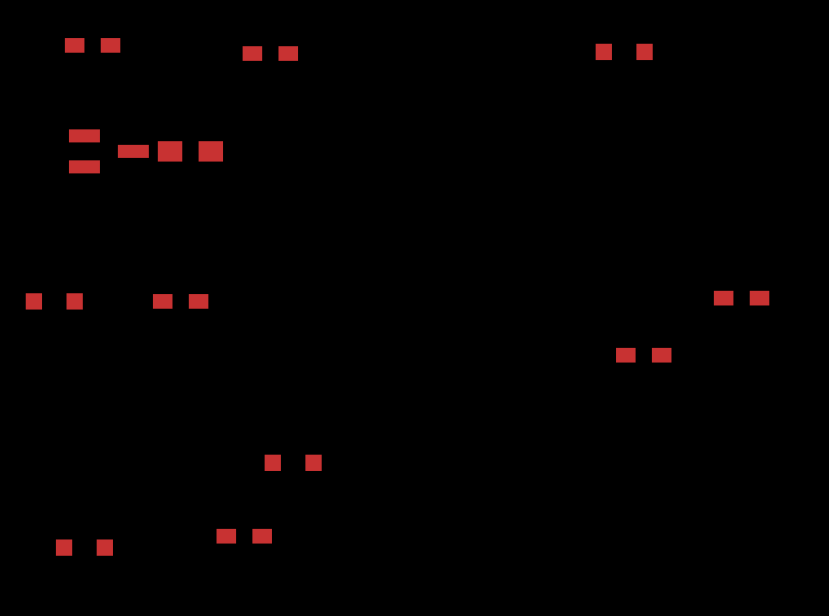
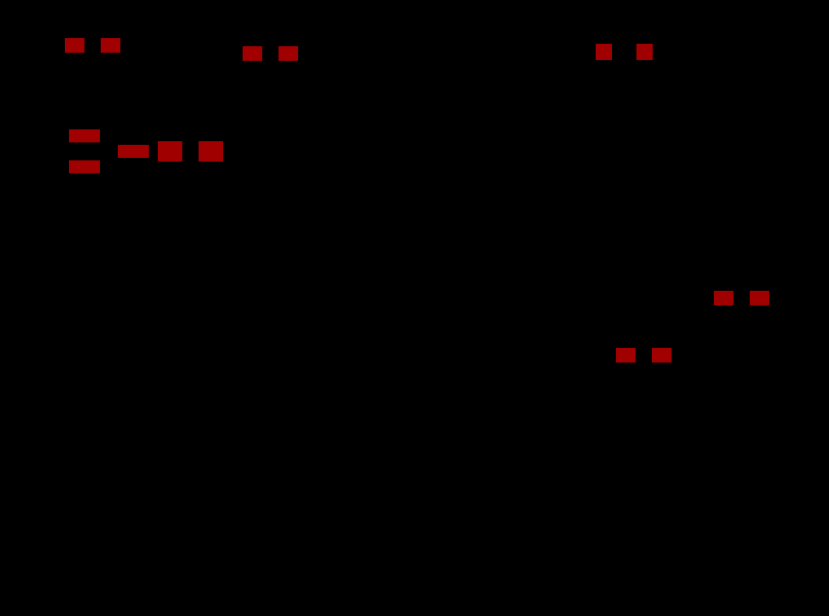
part: (54, 301) -> none
part: (180, 301) -> none
part: (293, 462) -> none
part: (244, 536) -> none
part: (84, 547) -> none

